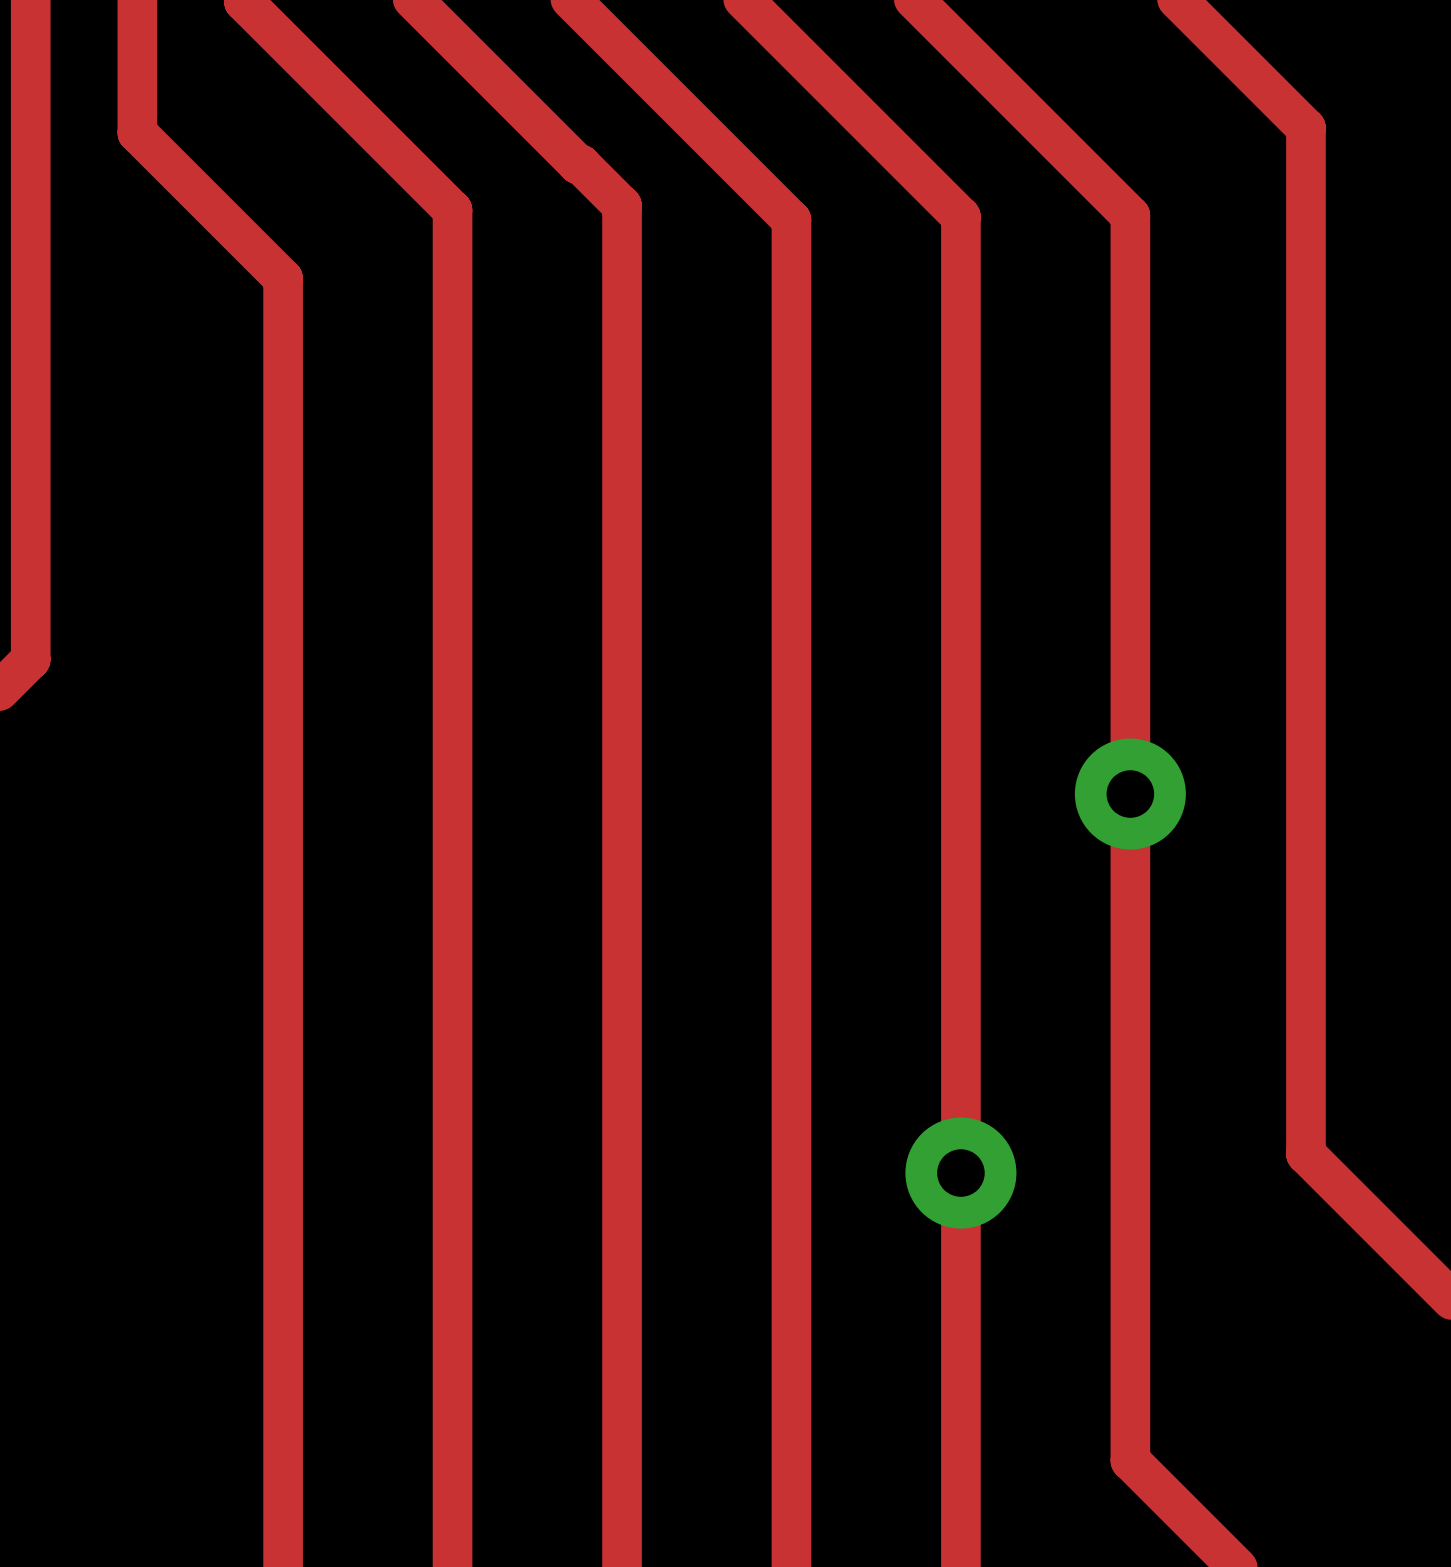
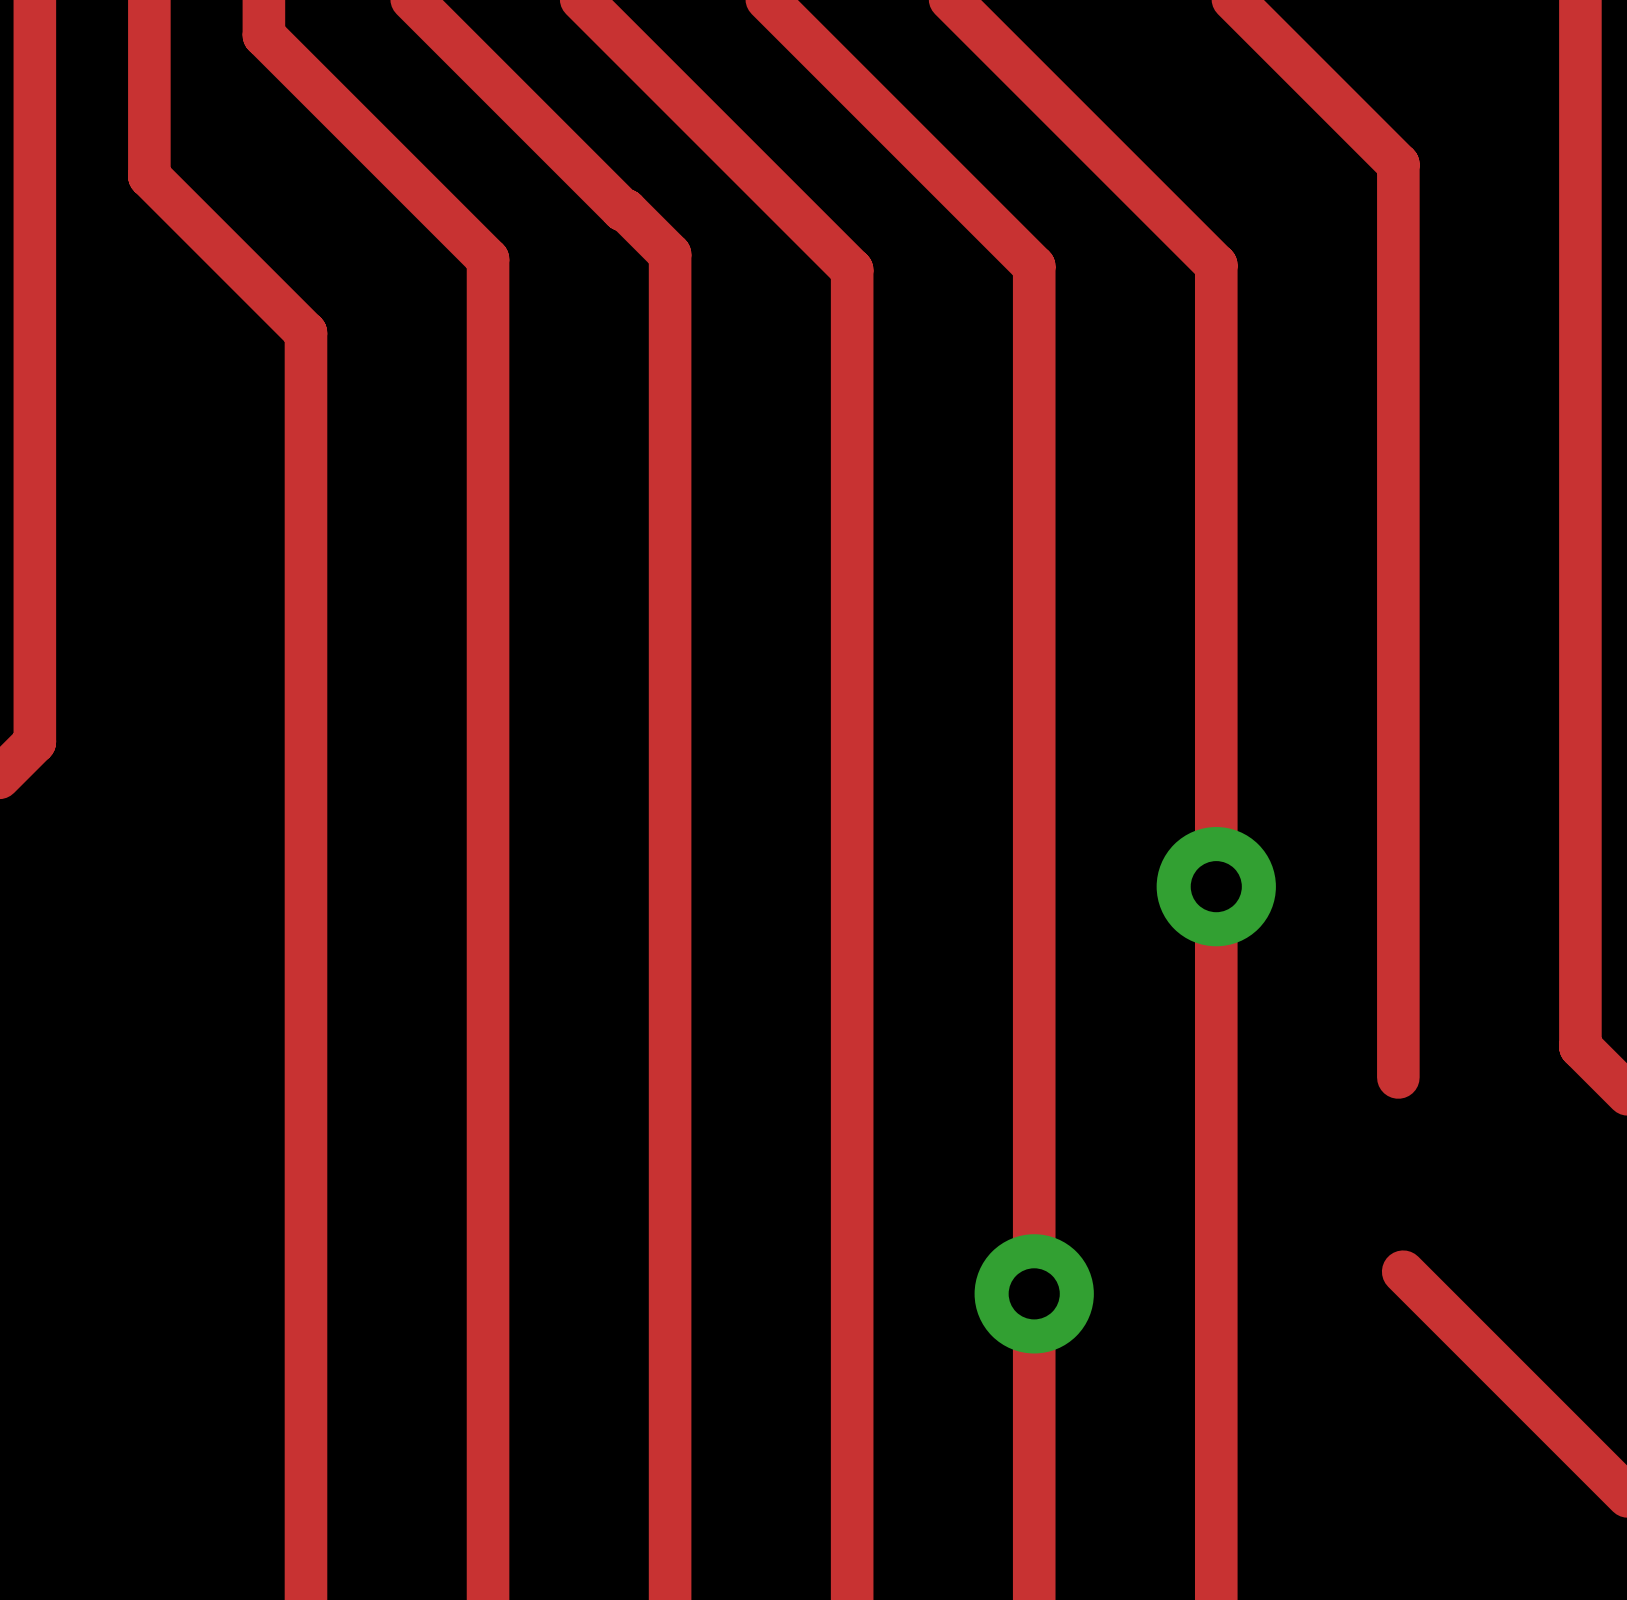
track: (1299, 121) (1305, 127) (1305, 1154) -> (1398, 164) (1398, 1077)

